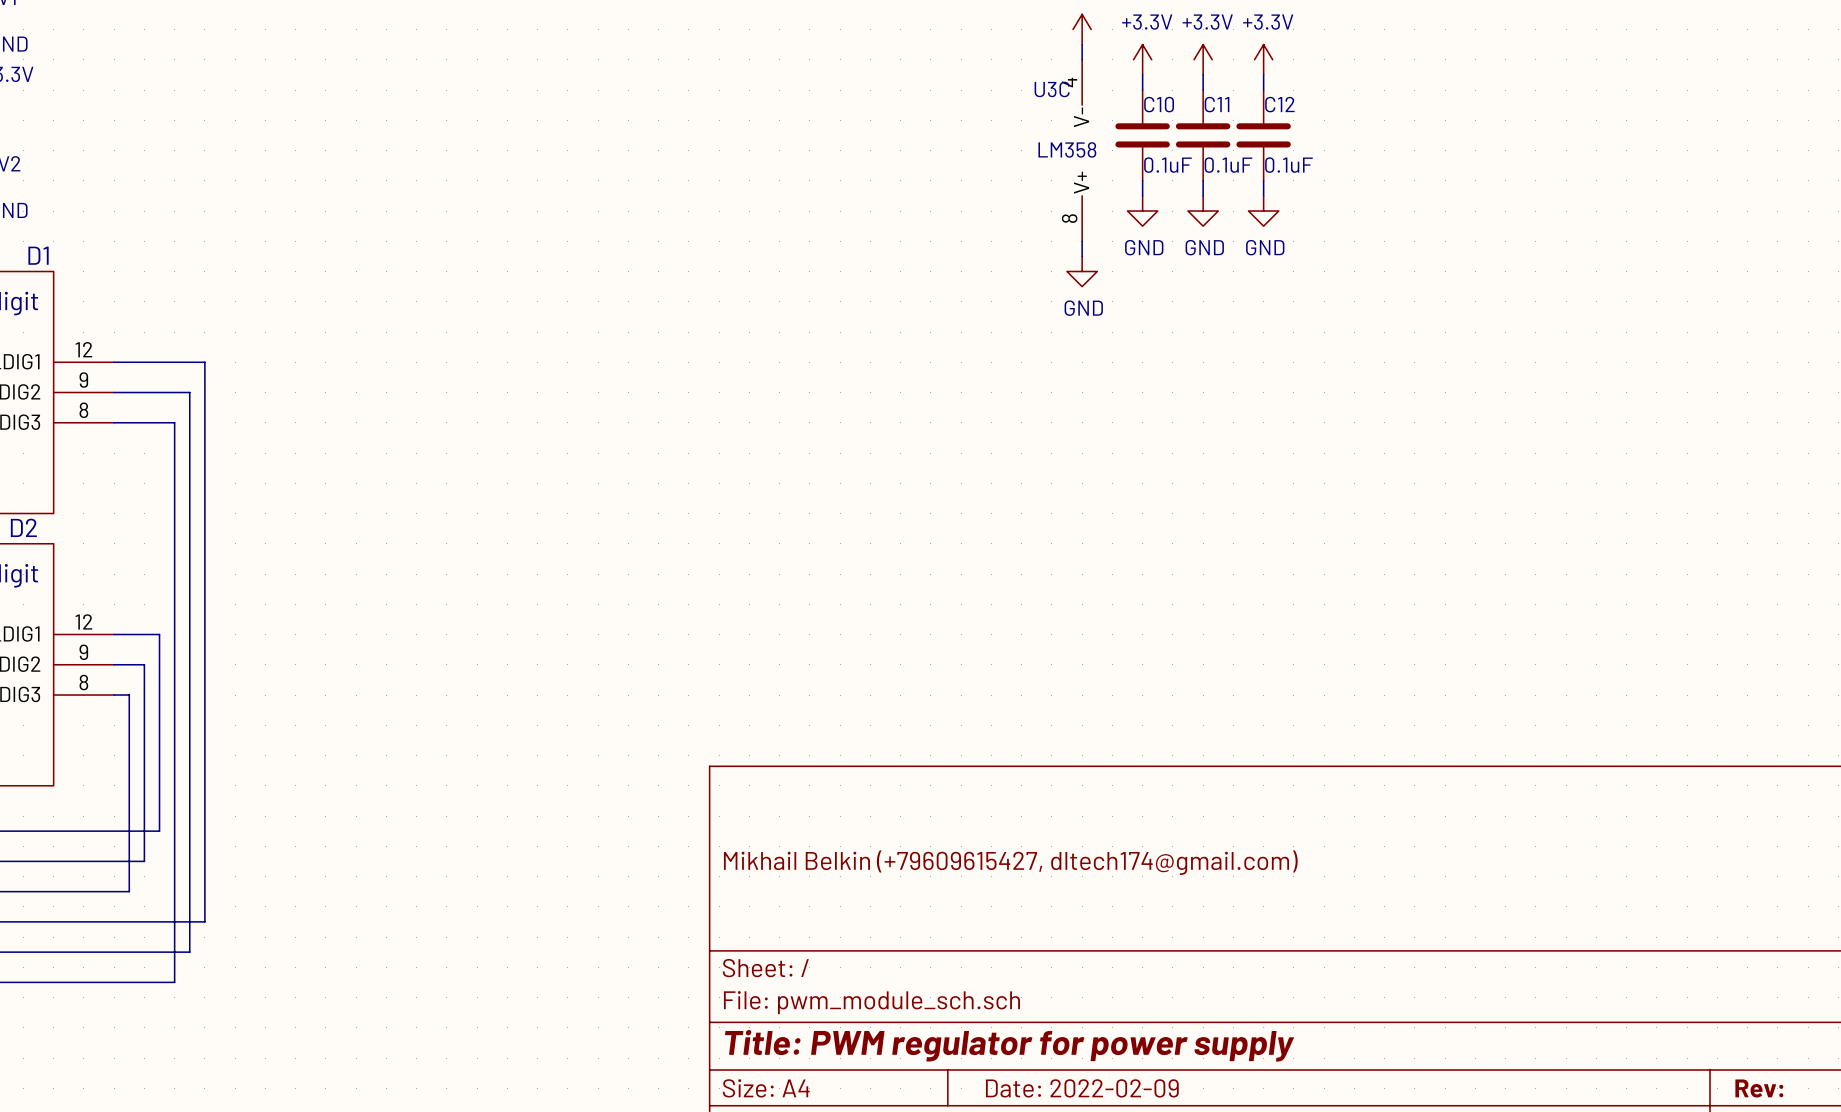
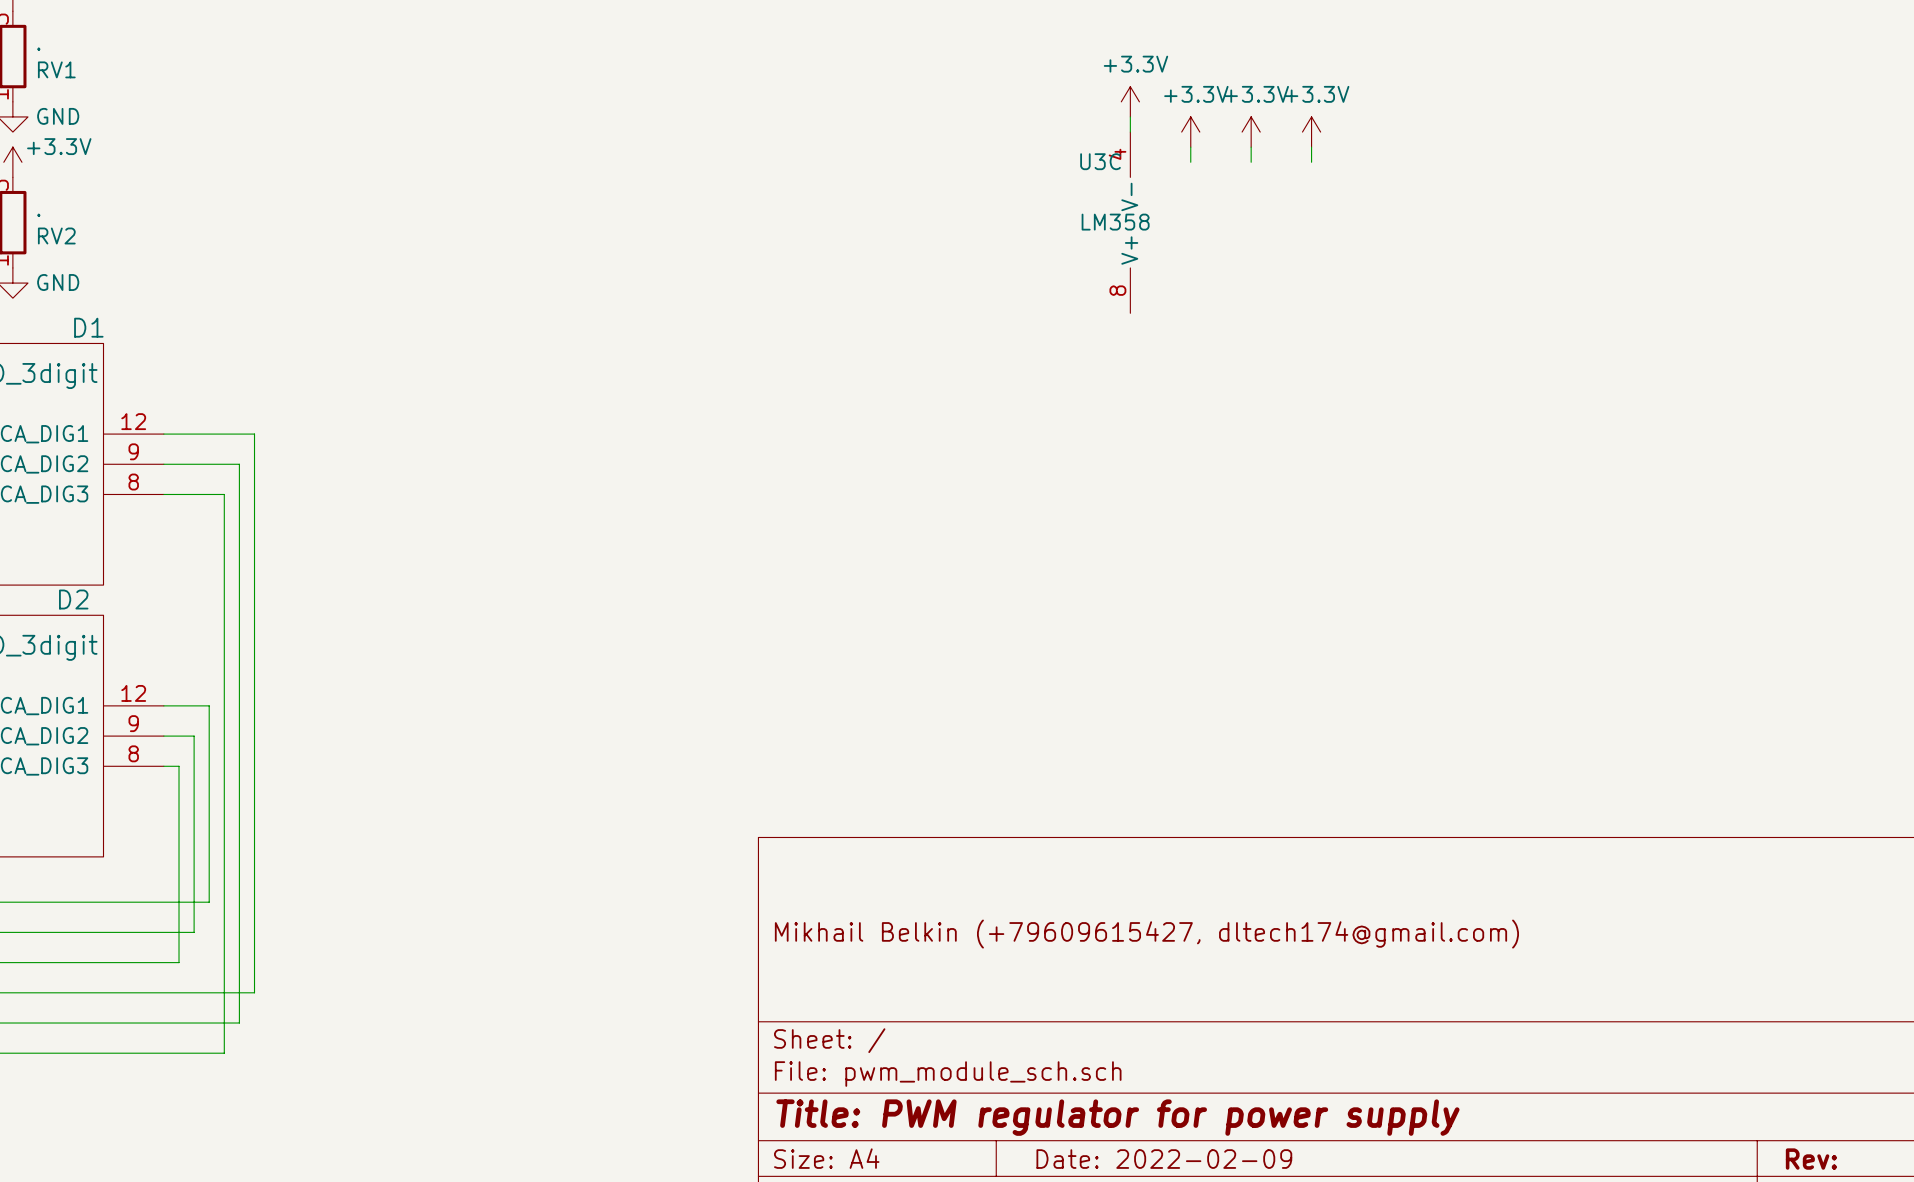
C10: 0.1uF (1142, 135) -> none
C11: 0.1uF (1203, 135) -> none
C12: 0.1uF (1263, 135) -> none
wire: (1142, 180) (1142, 195) -> none
wire: (1203, 180) (1203, 195) -> none
wire: (1263, 180) (1263, 195) -> none
power symbol: GND (1142, 211) -> none
power symbol: GND (1203, 211) -> none
power symbol: GND (1263, 211) -> none
wire: (1082, 241) (1082, 256) -> none
power symbol: GND (1082, 271) -> none

